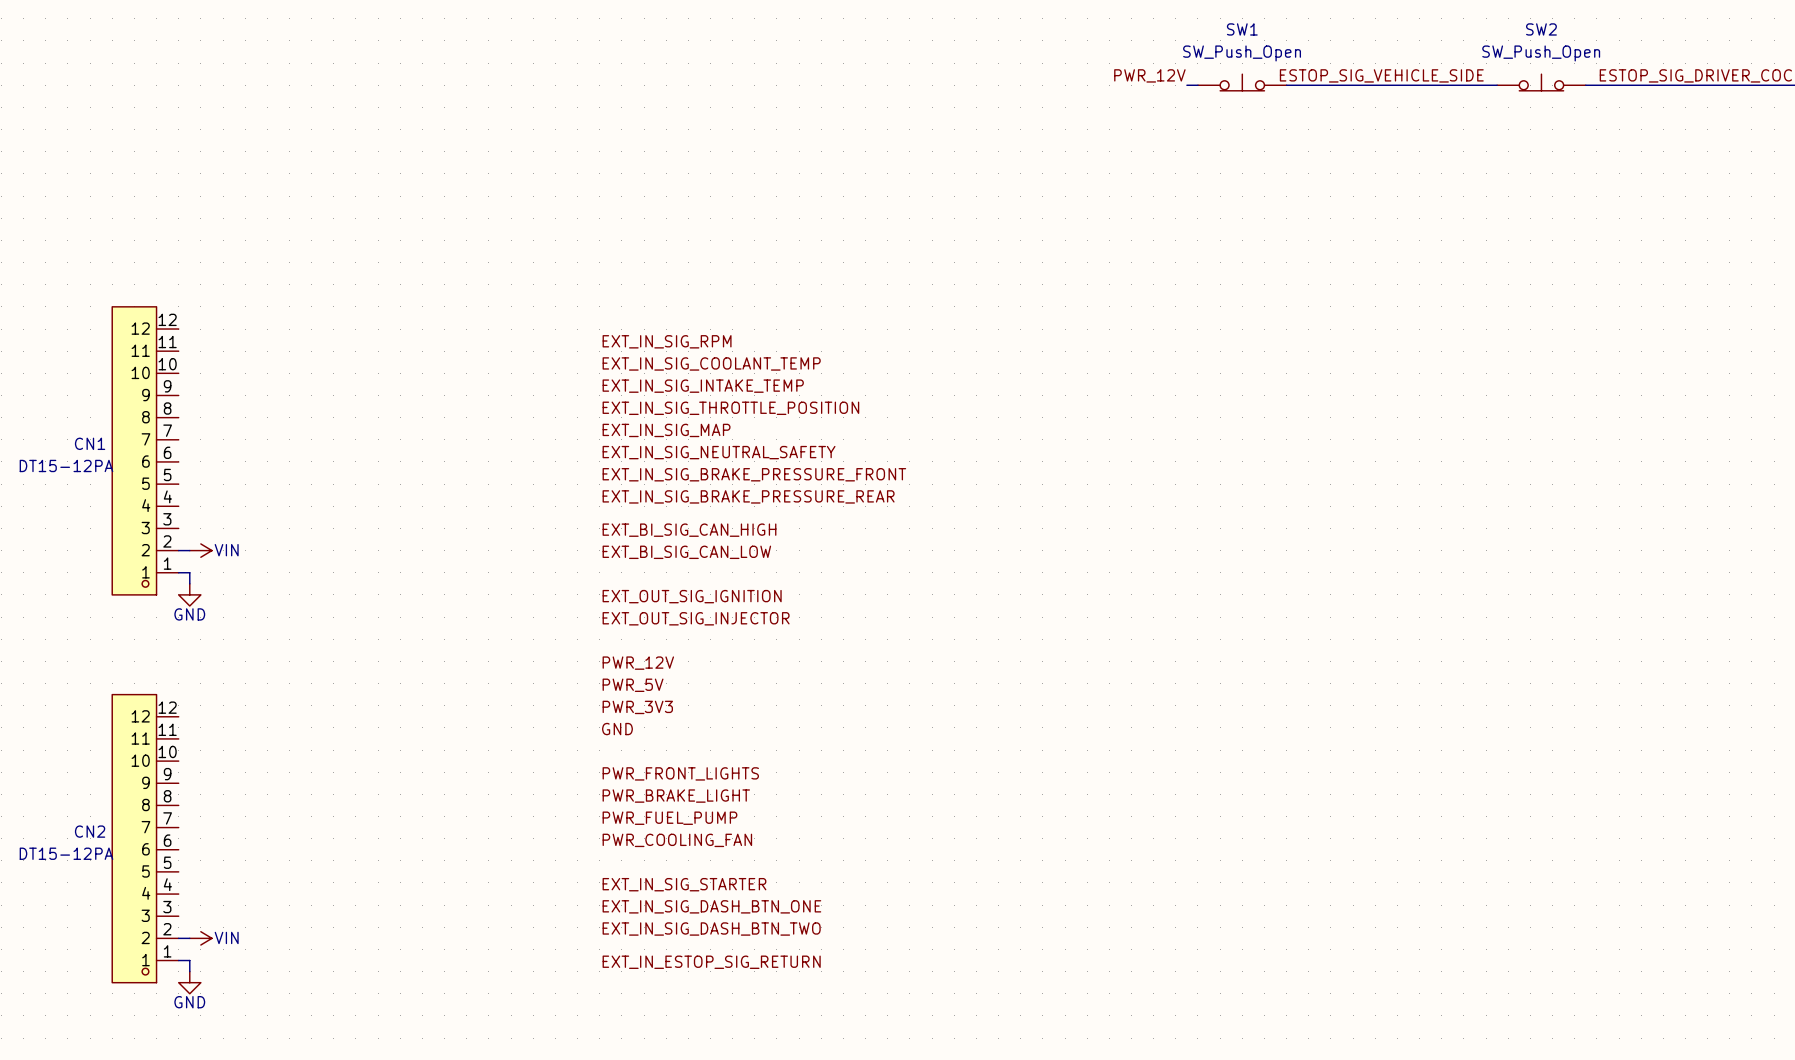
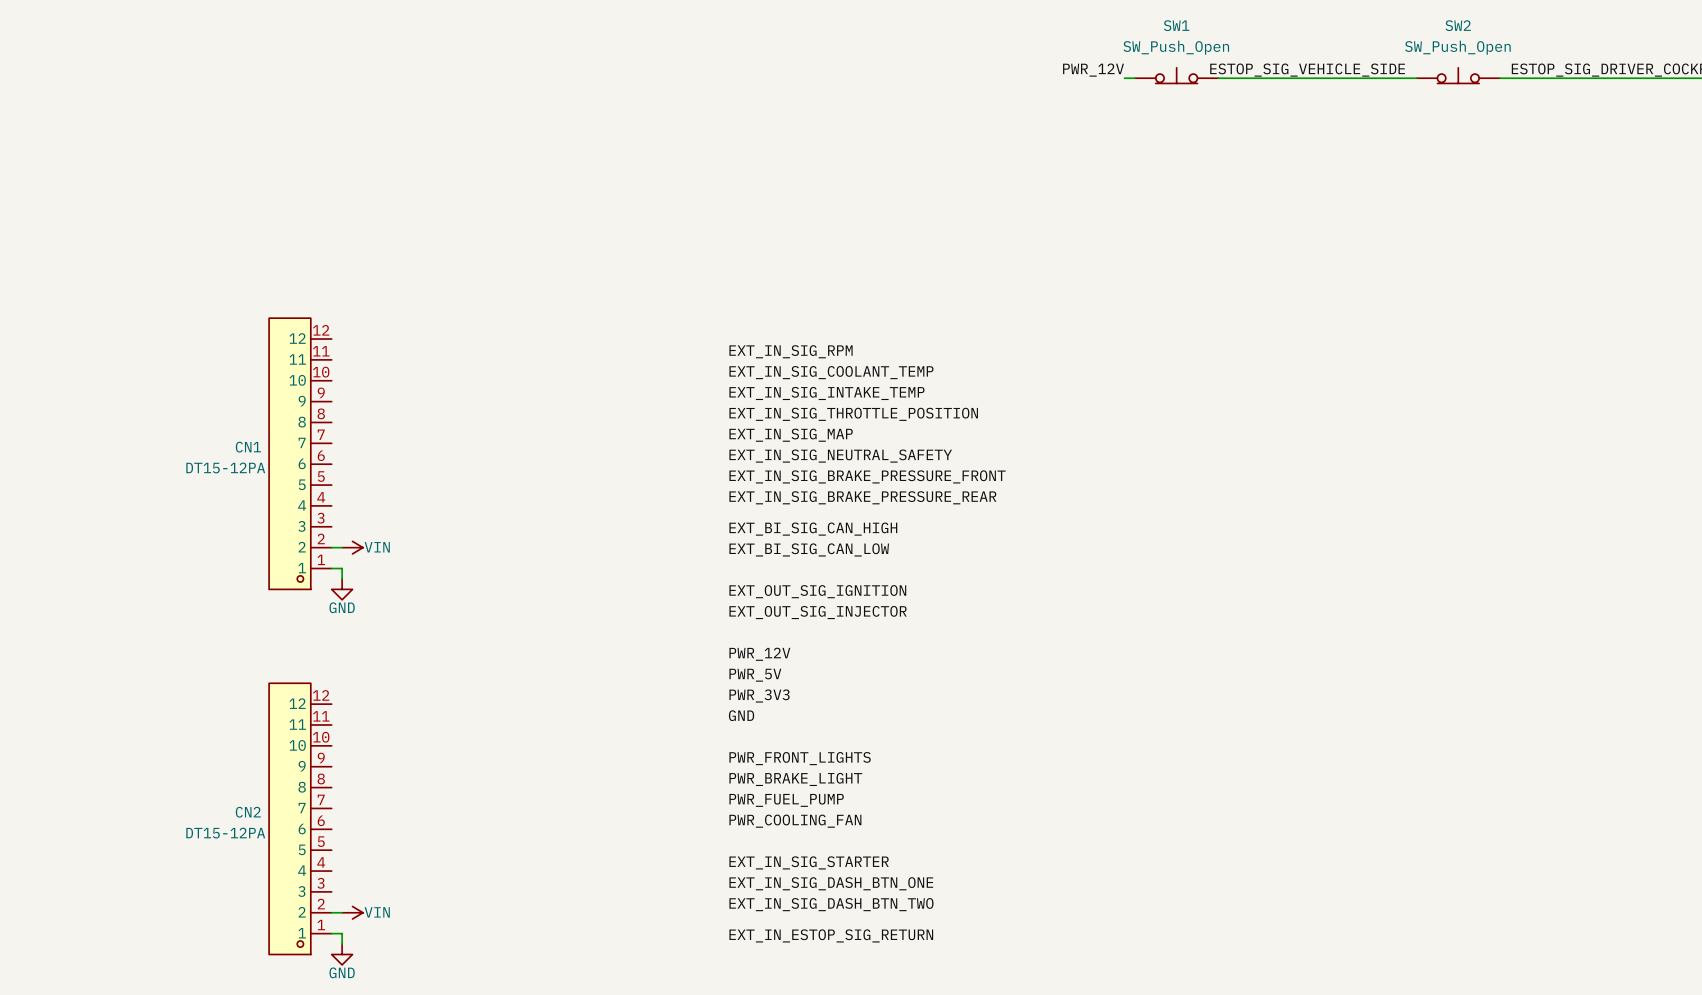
label position: EXT_IN_SIG_RPM (667, 341) -> EXT_IN_SIG_RPM (791, 351)
label position: EXT_IN_SIG_COOLANT_TEMP (711, 363) -> EXT_IN_SIG_COOLANT_TEMP (831, 372)
label position: EXT_IN_SIG_INTAKE_TEMP (703, 386) -> EXT_IN_SIG_INTAKE_TEMP (826, 393)
label position: EXT_IN_SIG_THROTTLE_POSITION (730, 408) -> EXT_IN_SIG_THROTTLE_POSITION (853, 414)
label position: EXT_IN_SIG_MAP (666, 430) -> EXT_IN_SIG_MAP (791, 435)
CN1 position: (145, 450) -> (300, 453)
label position: EXT_IN_SIG_NEUTRAL_SAFETY (719, 452) -> EXT_IN_SIG_NEUTRAL_SAFETY (840, 456)
label position: EXT_IN_SIG_BRAKE_PRESSURE_FRONT (754, 474) -> EXT_IN_SIG_BRAKE_PRESSURE_FRONT (867, 476)
label position: EXT_IN_SIG_BRAKE_PRESSURE_REAR (748, 496) -> EXT_IN_SIG_BRAKE_PRESSURE_REAR (862, 497)
label position: EXT_BI_SIG_CAN_HIGH (689, 530) -> EXT_BI_SIG_CAN_HIGH (813, 529)
wire: (178, 550) (189, 550) -> (331, 547) (342, 547)
power symbol position: VIN (200, 550) -> VIN (352, 547)
label position: EXT_BI_SIG_CAN_LOW (686, 552) -> EXT_BI_SIG_CAN_LOW (809, 549)
wire: (178, 572) (189, 572) (189, 583) -> (331, 568) (342, 568) (342, 578)
power symbol position: GND (189, 594) -> GND (342, 589)
label position: EXT_OUT_SIG_IGNITION (692, 596) -> EXT_OUT_SIG_IGNITION (817, 591)
label position: EXT_OUT_SIG_INJECTOR (696, 618) -> EXT_OUT_SIG_INJECTOR (818, 612)
label position: PWR_12V (638, 663) -> PWR_12V (759, 654)
label position: PWR_5V (633, 685) -> PWR_5V (755, 675)
label position: PWR_3V3 (637, 707) -> PWR_3V3 (759, 695)
label position: GND (617, 729) -> GND (741, 715)
label position: PWR_FRONT_LIGHTS (680, 773) -> PWR_FRONT_LIGHTS (800, 758)
label position: PWR_BRAKE_LIGHT (676, 796) -> PWR_BRAKE_LIGHT (795, 779)
label position: PWR_FUEL_PUMP (669, 818) -> PWR_FUEL_PUMP (786, 800)
CN2 position: (145, 838) -> (300, 818)
label position: PWR_COOLING_FAN (677, 840) -> PWR_COOLING_FAN (795, 821)
label position: EXT_IN_SIG_STARTER (684, 884) -> EXT_IN_SIG_STARTER (809, 862)
label position: EXT_IN_SIG_DASH_BTN_ONE (711, 906) -> EXT_IN_SIG_DASH_BTN_ONE (831, 883)
label position: EXT_IN_SIG_DASH_BTN_TWO (711, 929) -> EXT_IN_SIG_DASH_BTN_TWO (831, 904)
wire: (178, 938) (189, 938) -> (331, 912) (342, 912)
power symbol position: VIN (200, 938) -> VIN (352, 912)
wire: (178, 960) (189, 960) (189, 971) -> (331, 933) (342, 933) (342, 944)
label position: EXT_IN_ESTOP_SIG_RETURN (711, 962) -> EXT_IN_ESTOP_SIG_RETURN (831, 935)
power symbol position: GND (189, 982) -> GND (342, 954)

